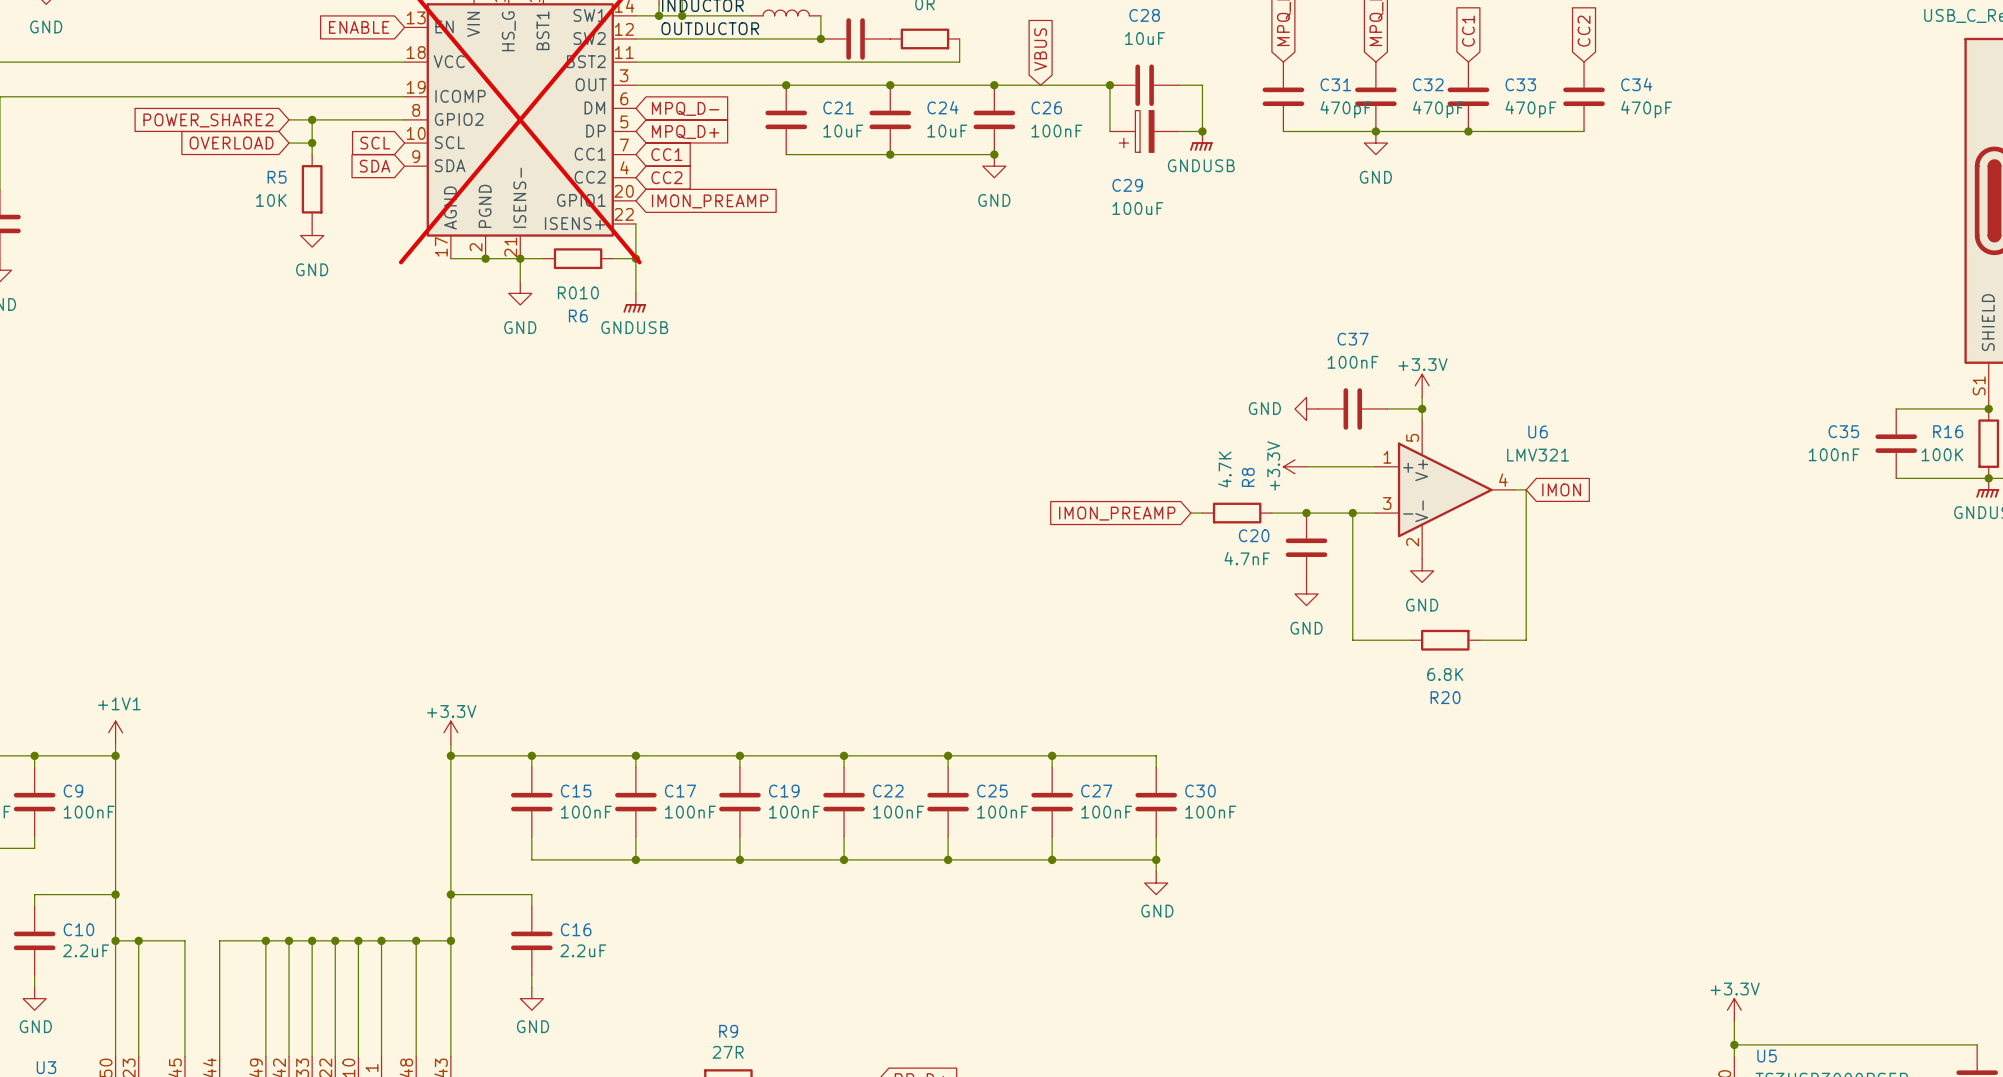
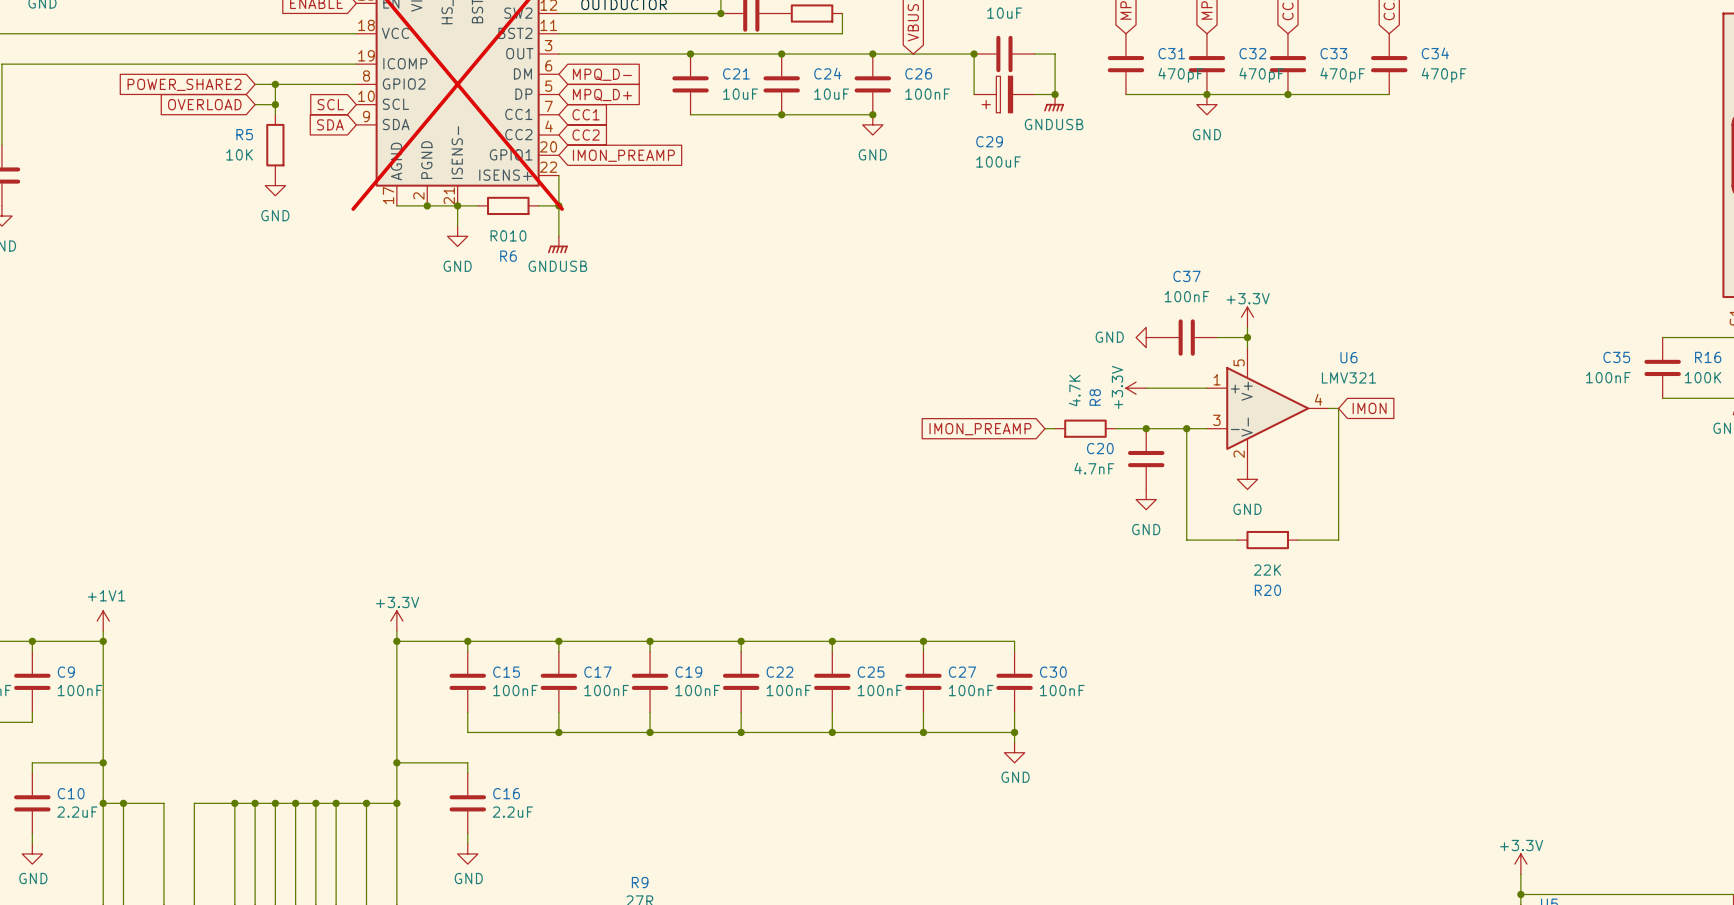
R20 value: 6.8K (1445, 674) -> 22K (1267, 570)

